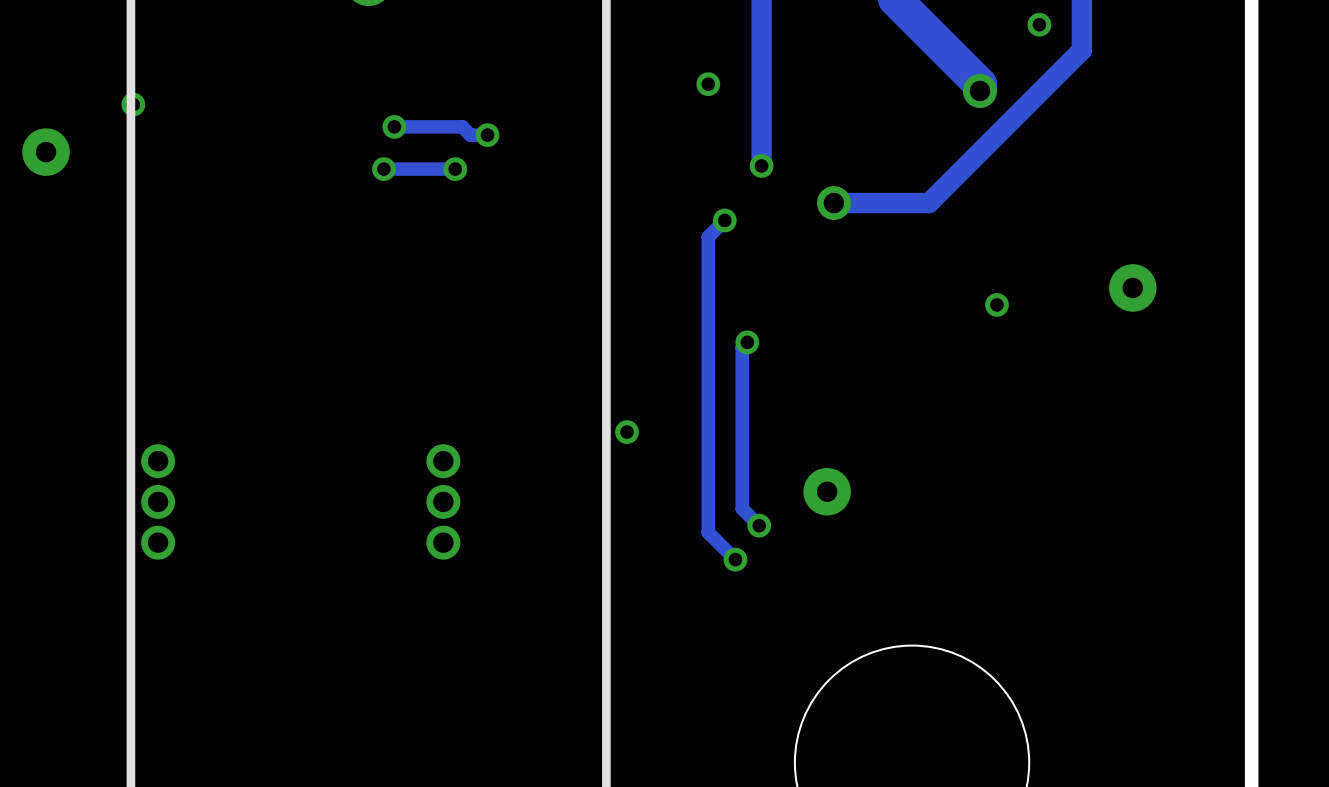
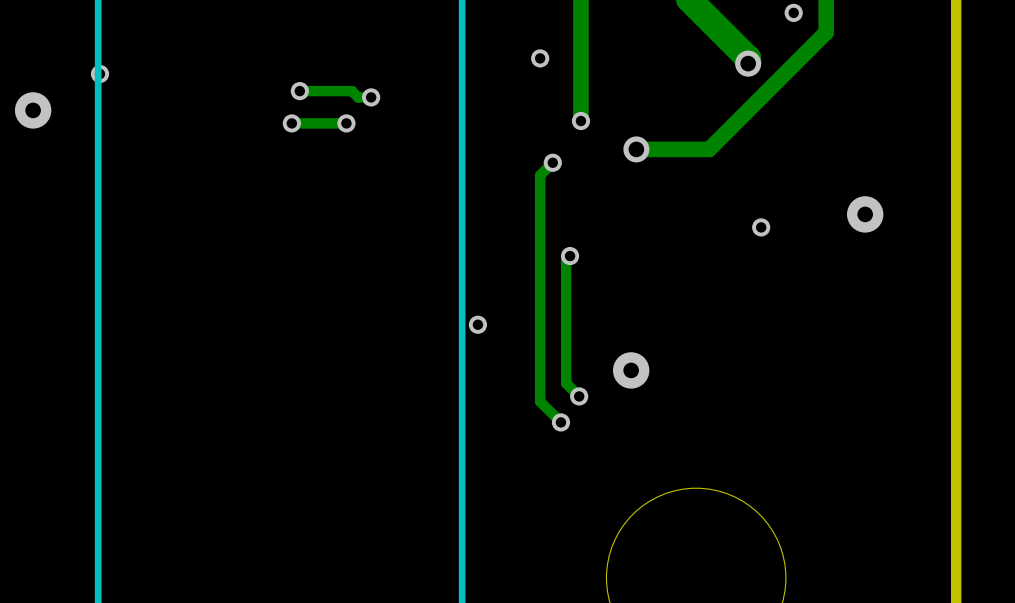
via: (158, 461) -> none
via: (443, 461) -> none
via: (158, 501) -> none
via: (443, 501) -> none
via: (158, 542) -> none
via: (443, 542) -> none

